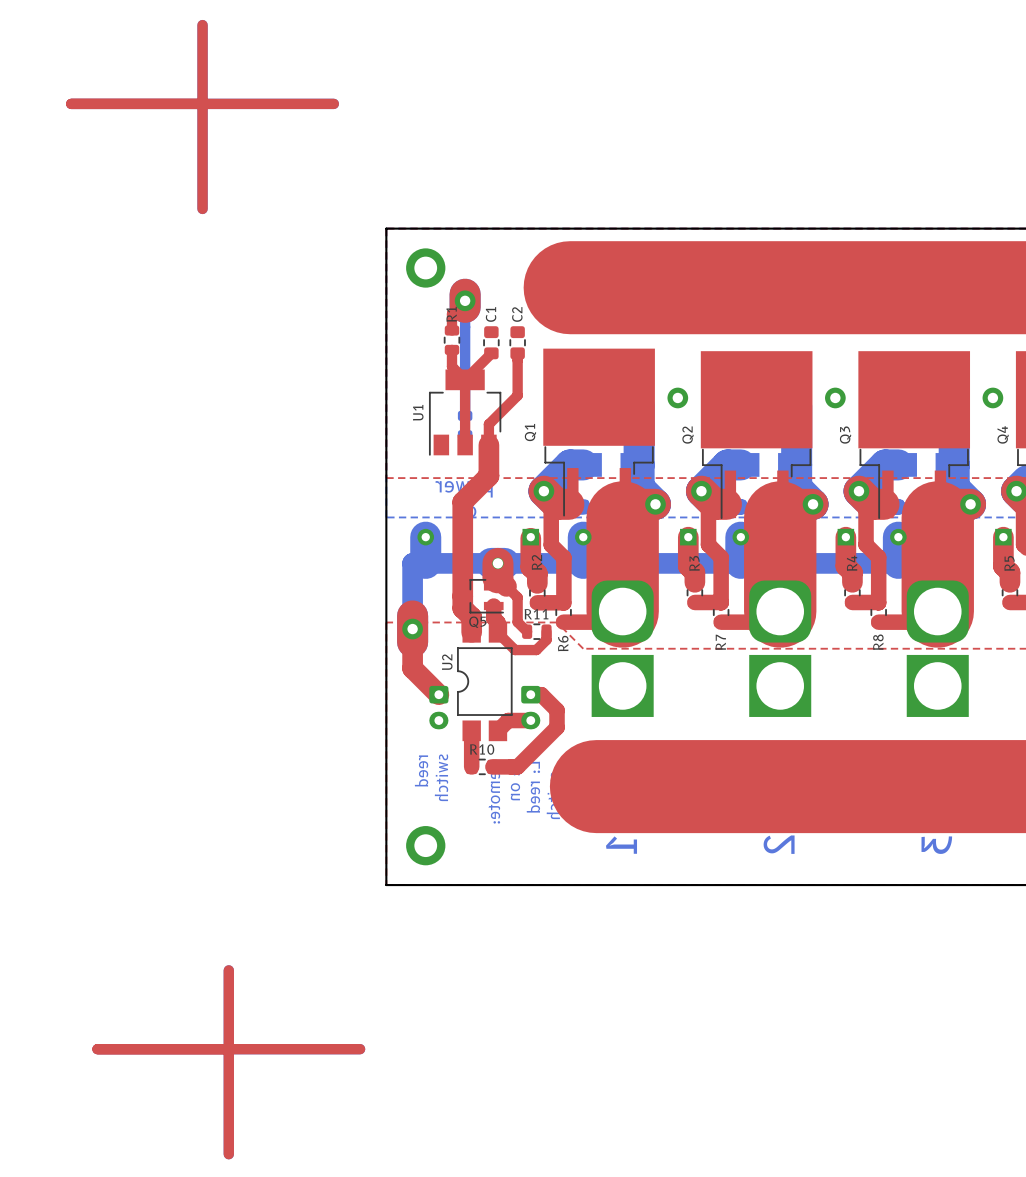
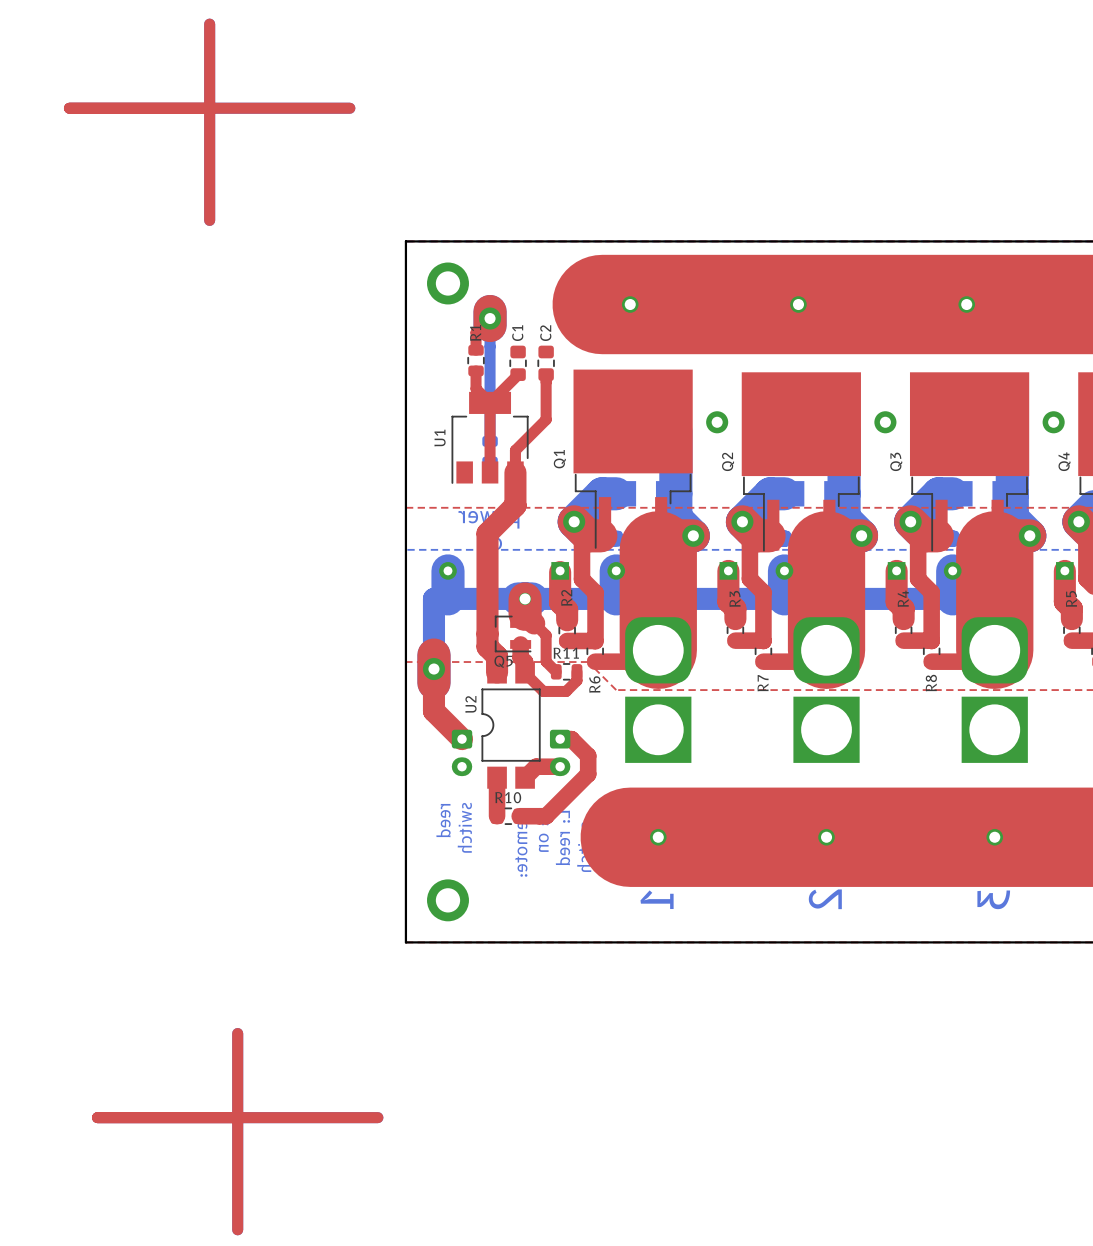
via: none -> (630, 304)
via: none -> (798, 304)
via: none -> (966, 304)
via: none -> (658, 837)
via: none -> (826, 837)
via: none -> (994, 837)

